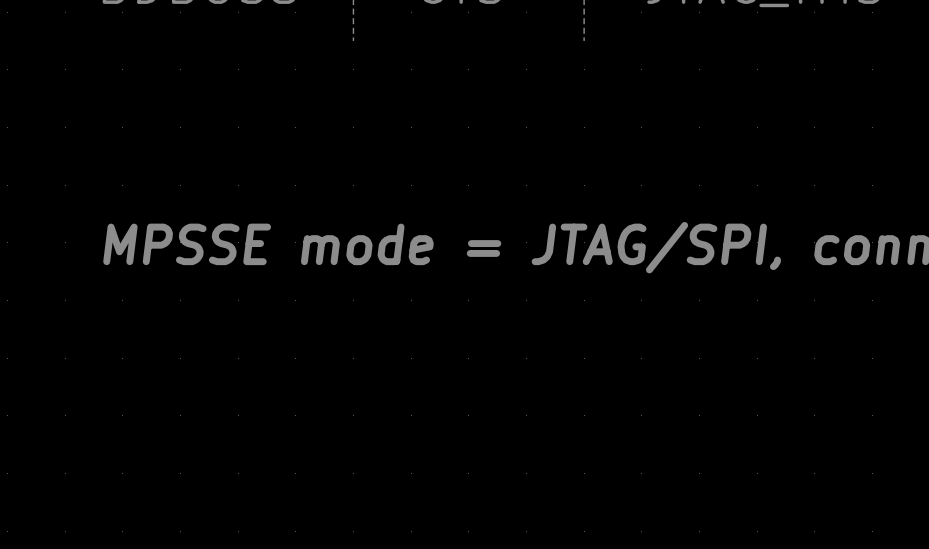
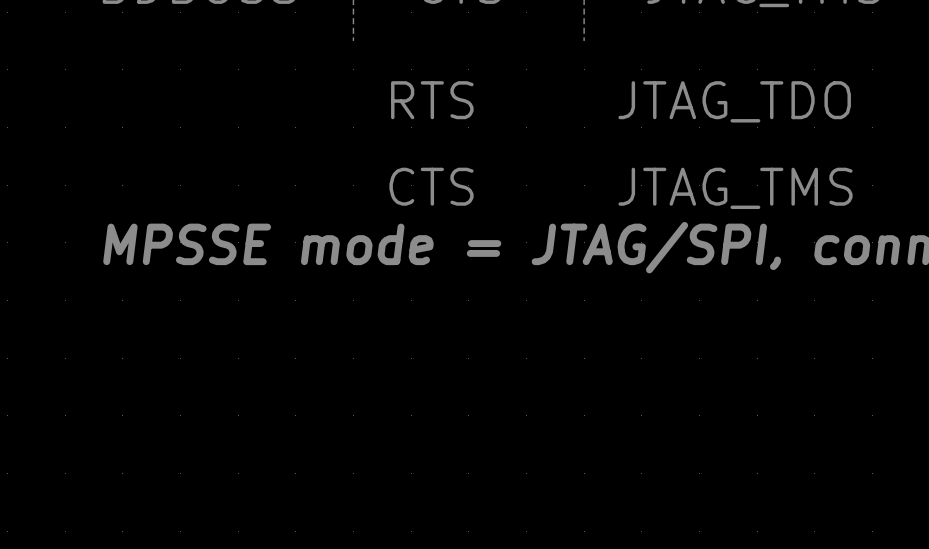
text: none -> RTS (432, 100)
text: none -> JTAG_TDO (734, 101)
text: none -> CTS (431, 186)
text: none -> JTAG_TMS (735, 188)

